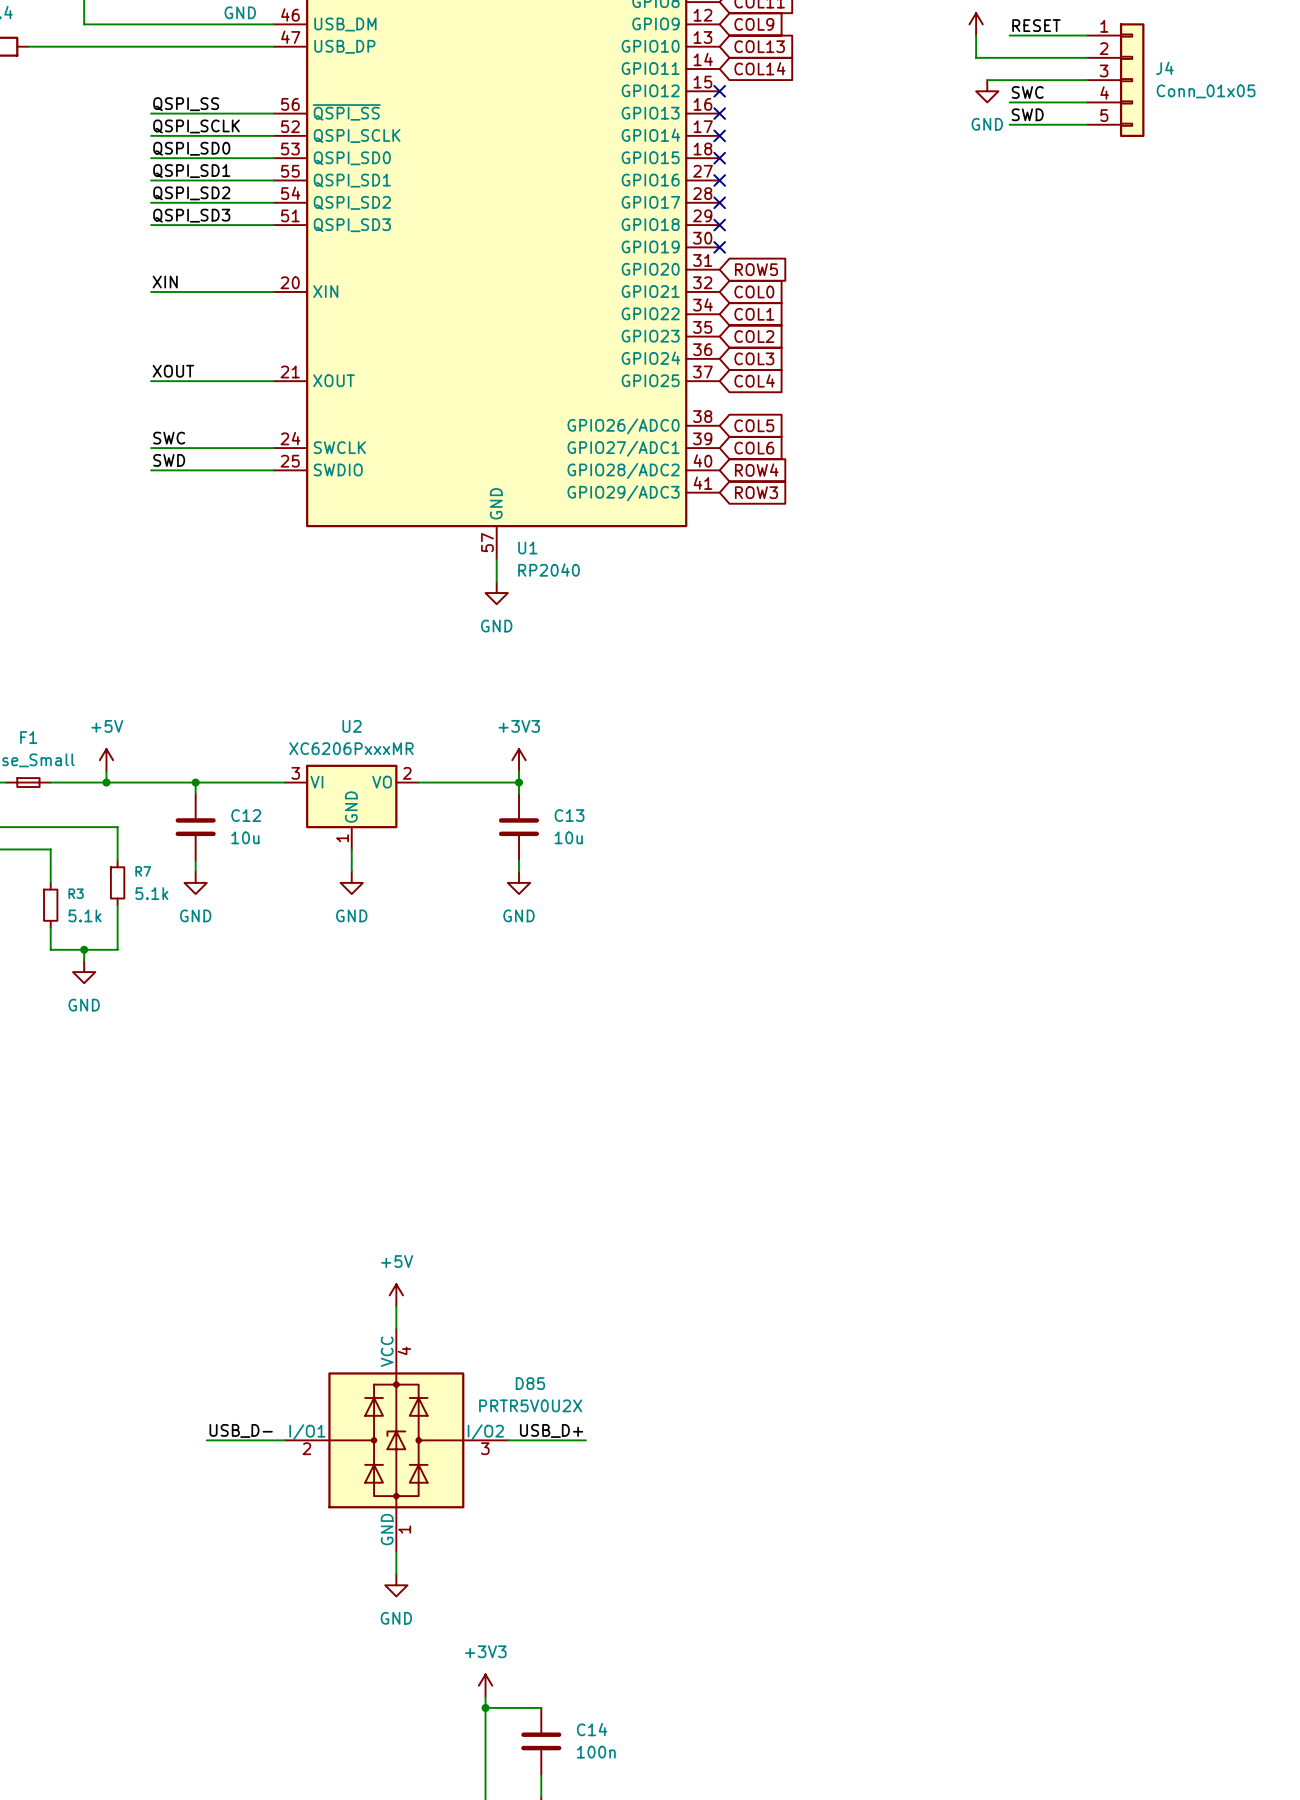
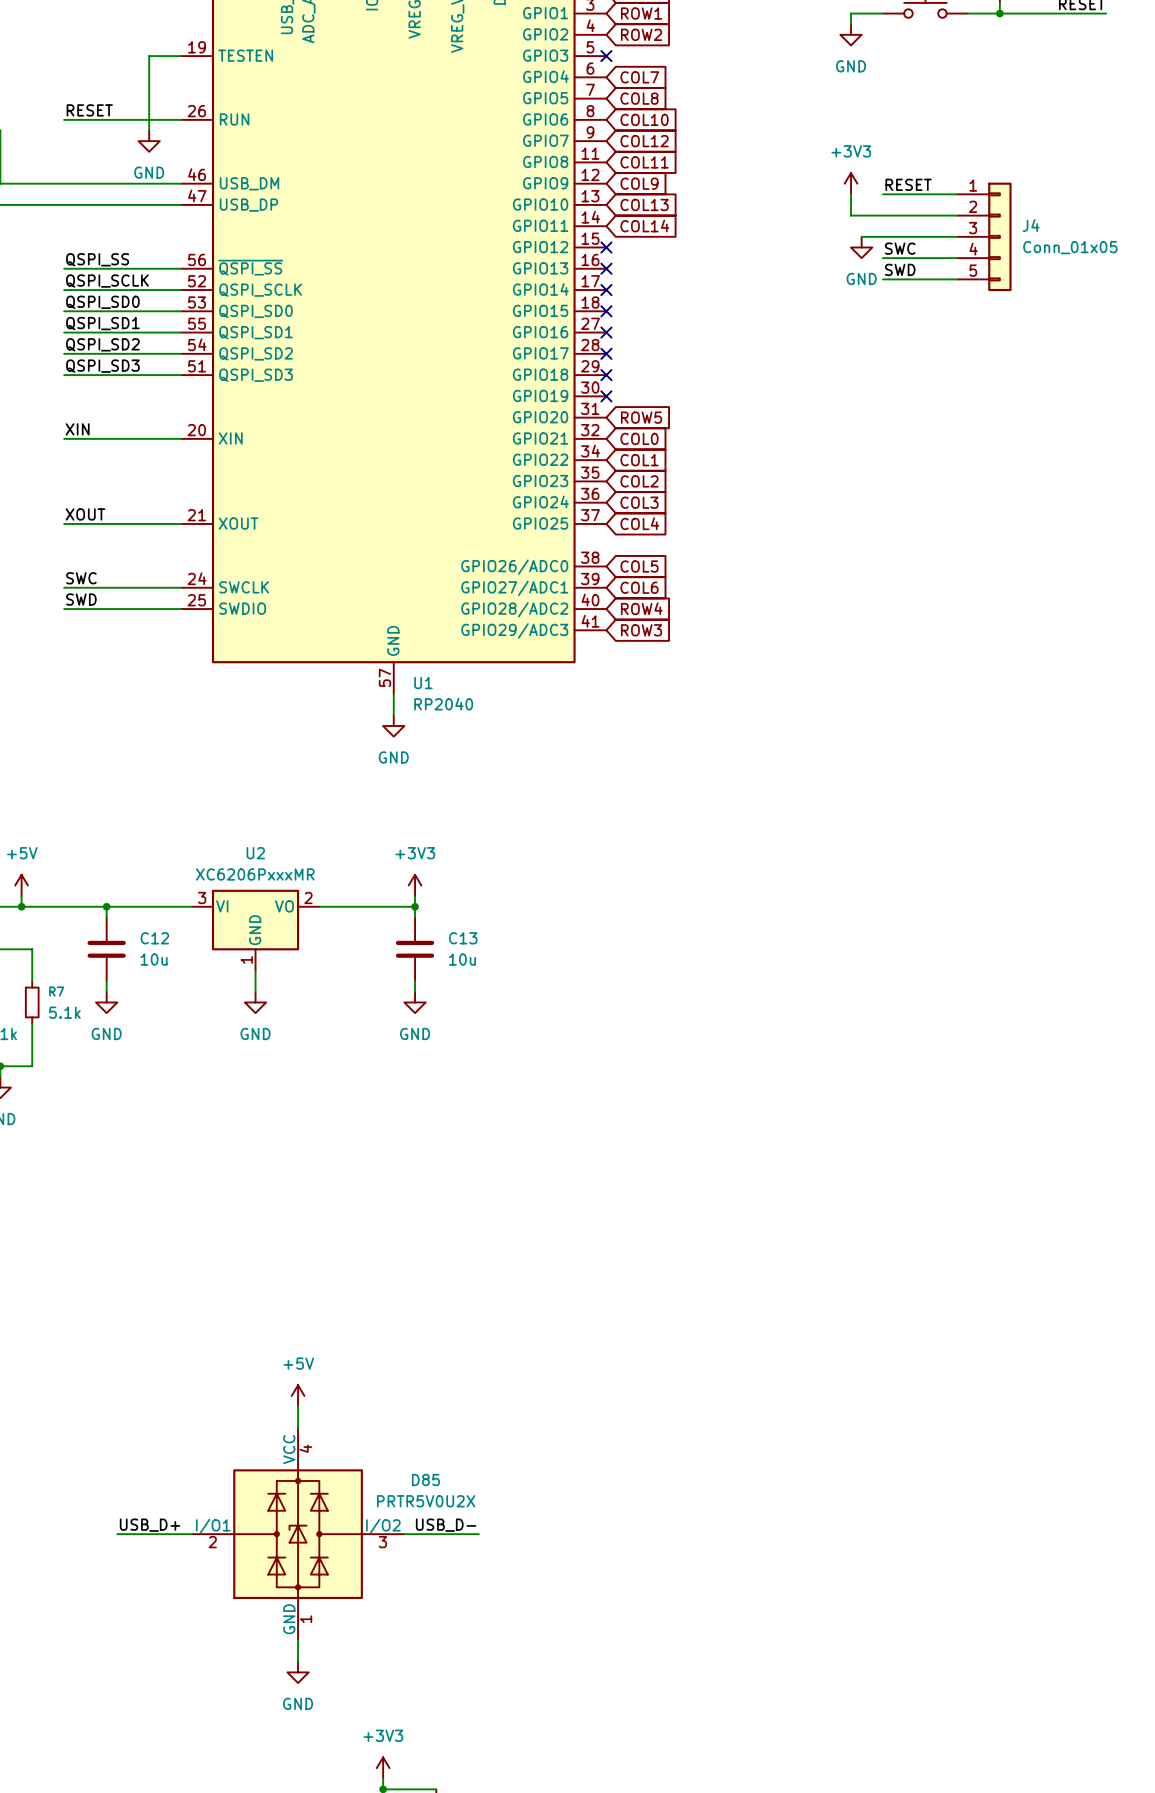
label: USB_D- (241, 1430) -> USB_D+ (150, 1525)
label: USB_D+ (551, 1430) -> USB_D- (446, 1525)

